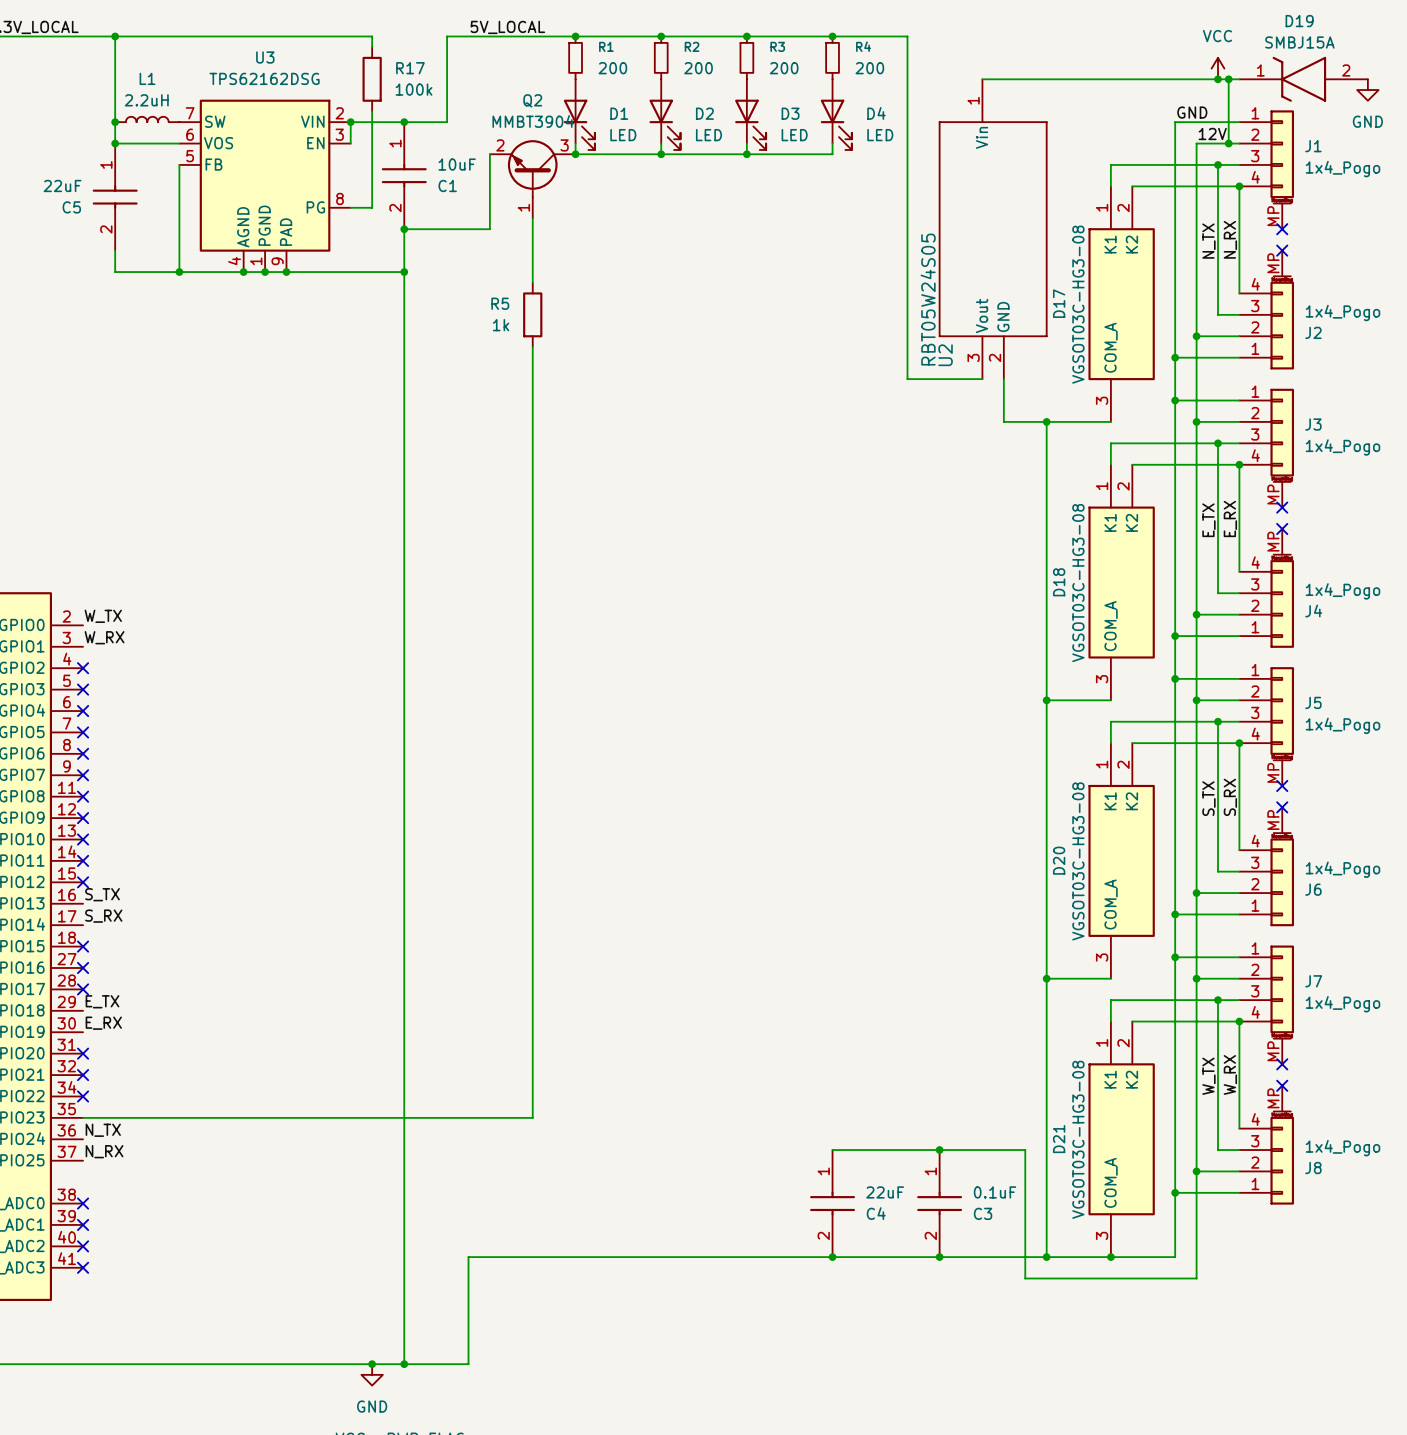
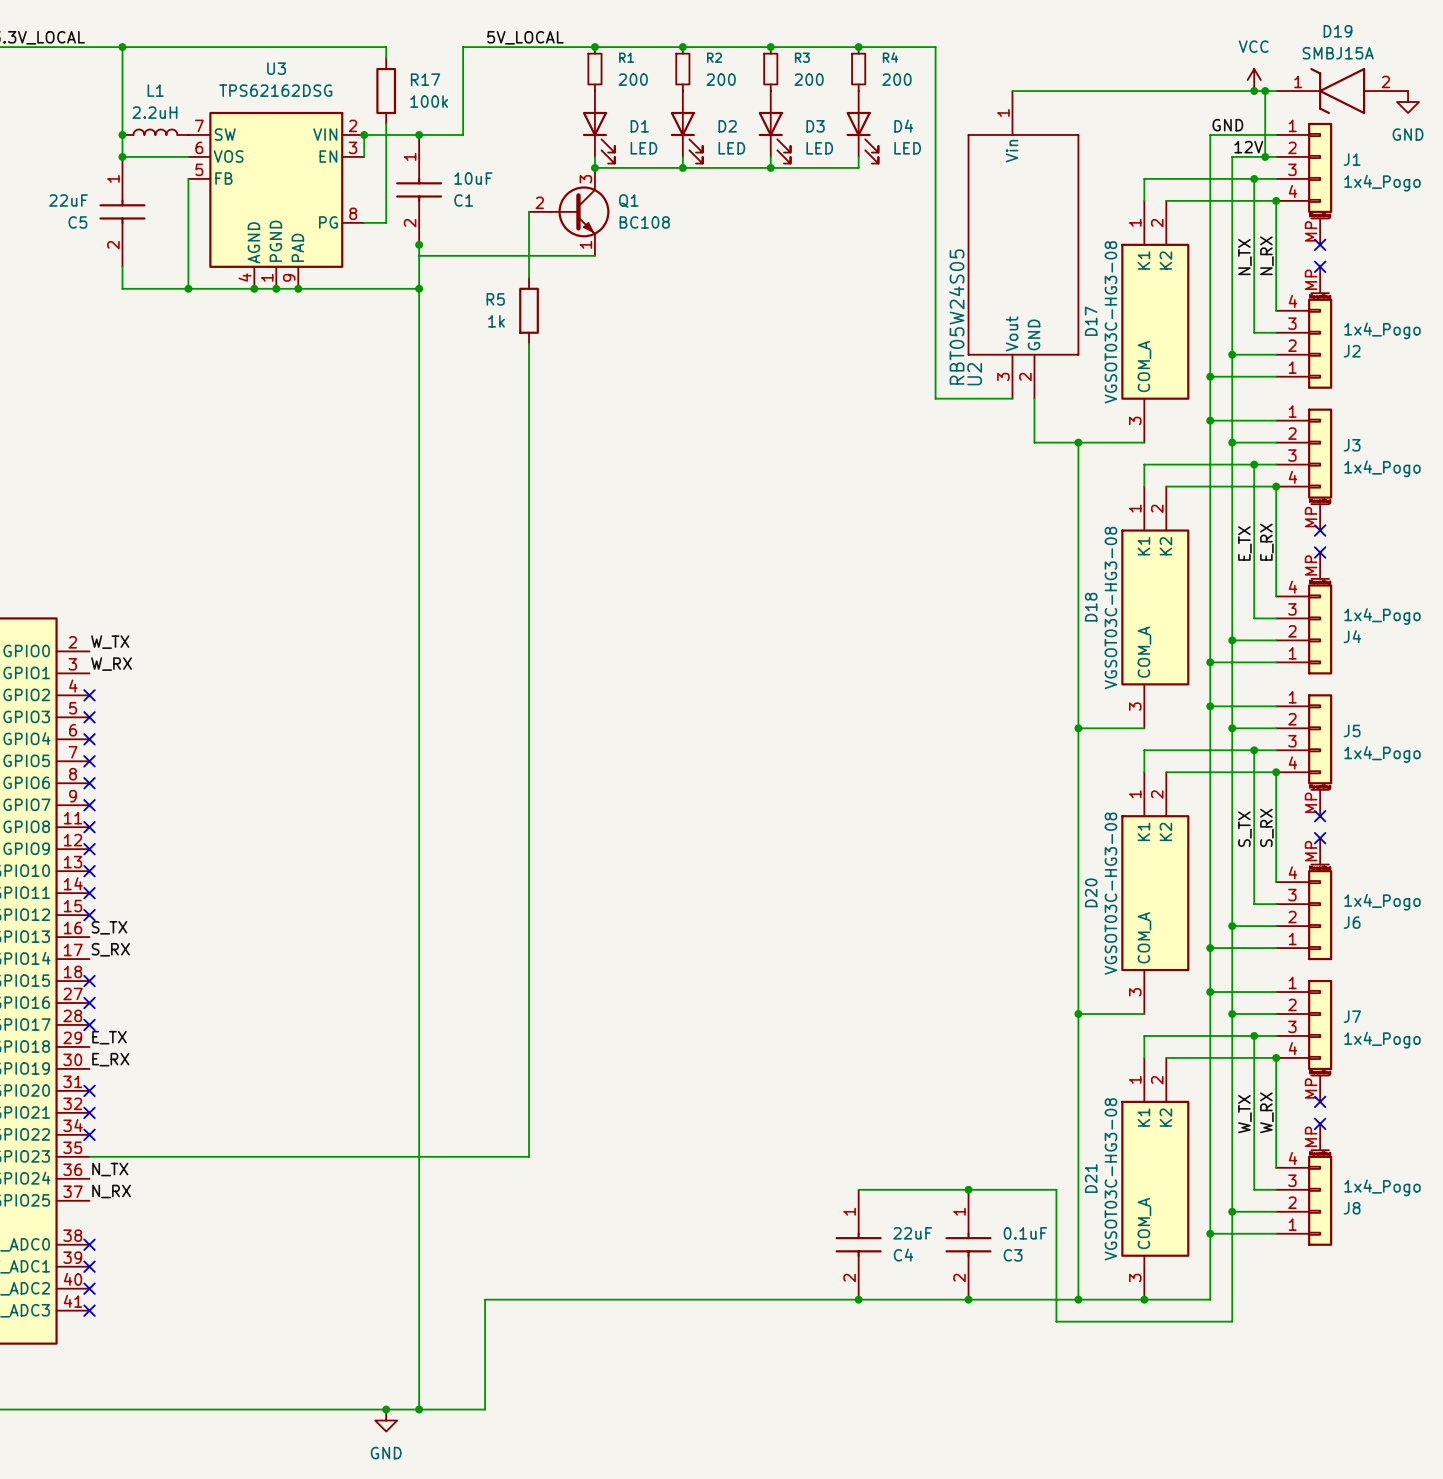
wire: (489, 154) (489, 229) (404, 229) -> none
Q2: MMBT3904 (532, 179) -> none
Q1: none -> BC108 (569, 211)
wire: (532, 218) (532, 282) -> (529, 211) (529, 277)
wire: none -> (419, 255) (594, 255)
R5 position: (532, 314) -> (529, 310)
wire: (532, 346) (532, 1117) (511, 1117) -> (529, 343) (529, 1156)

